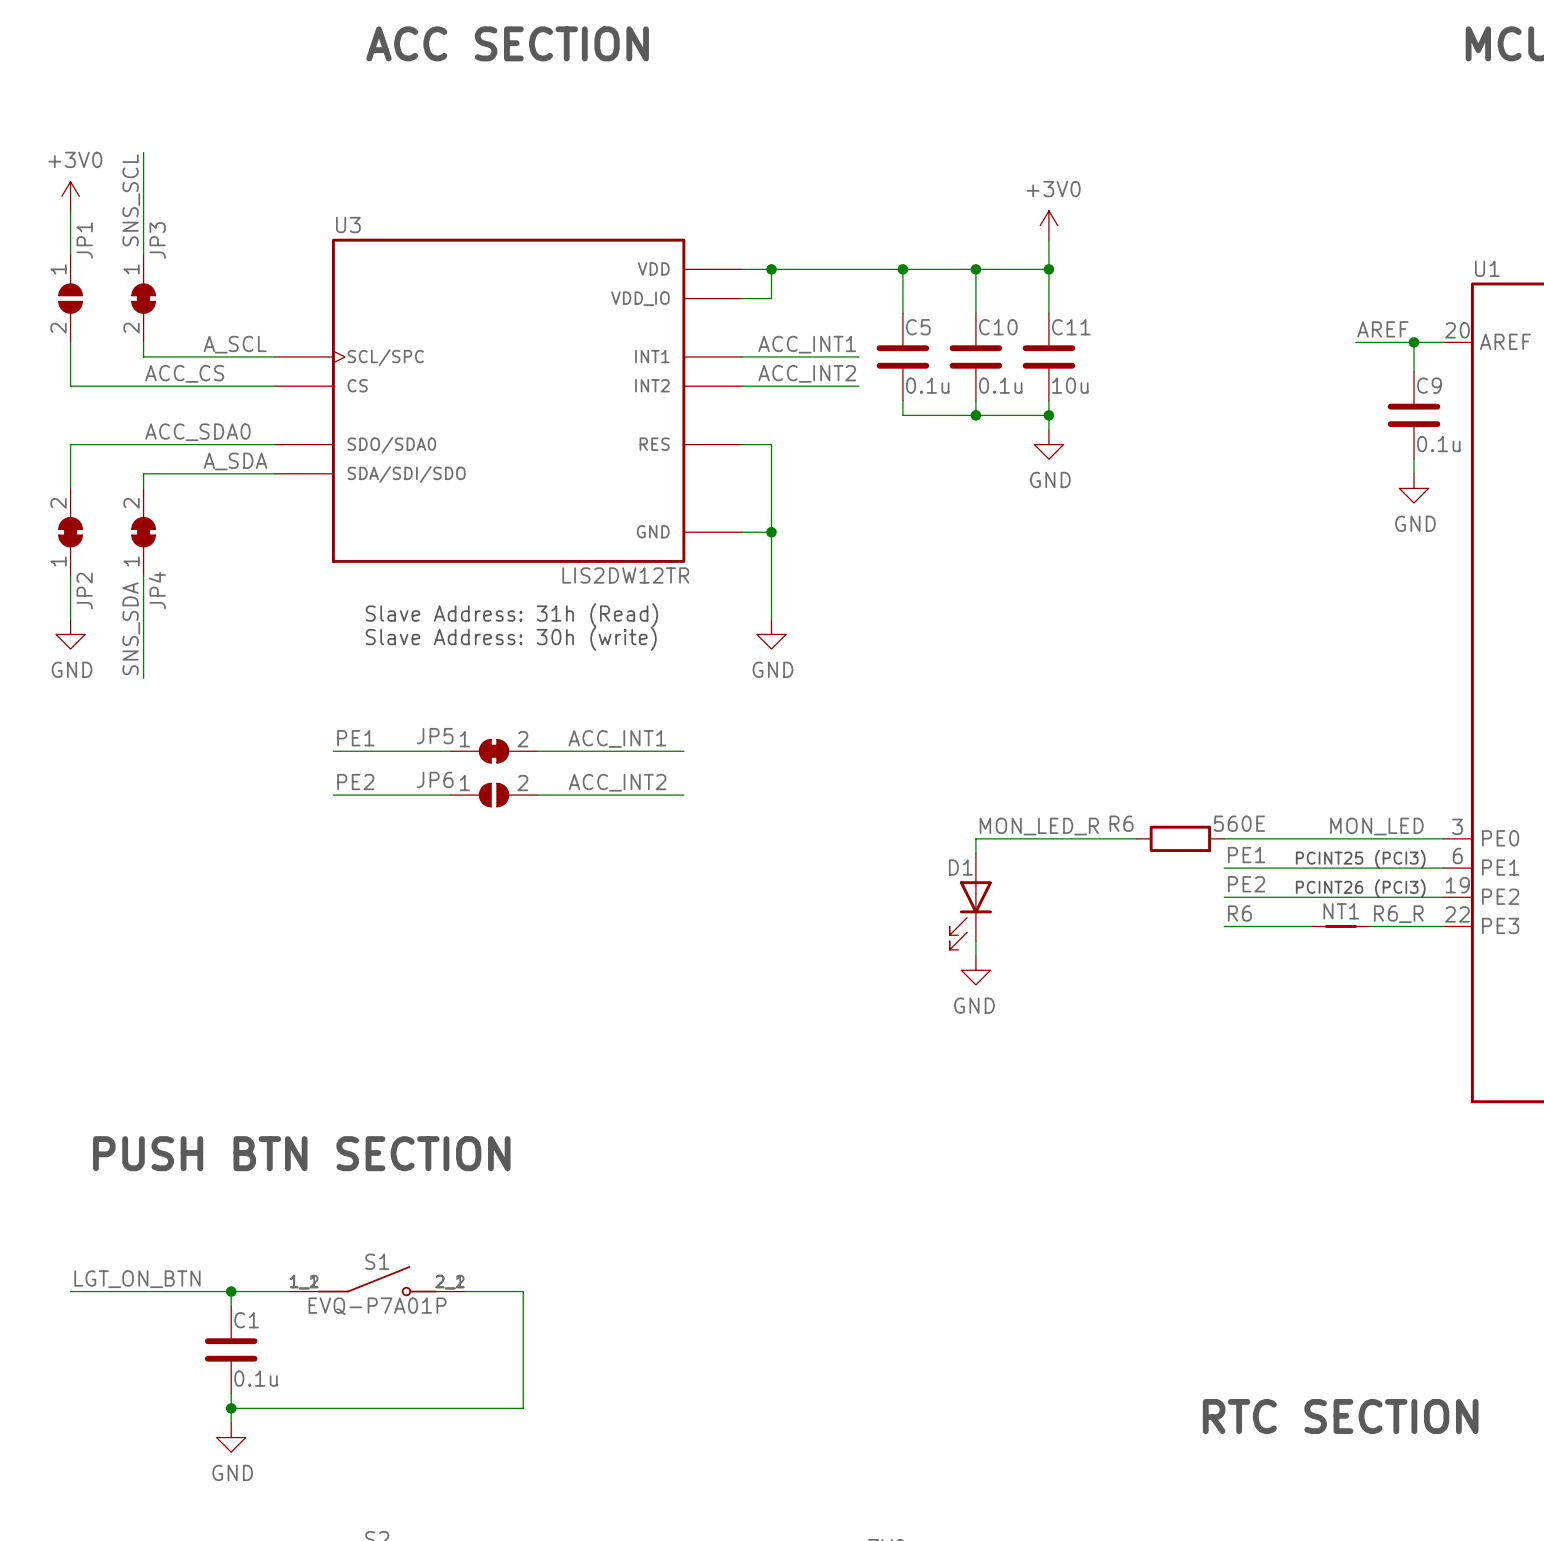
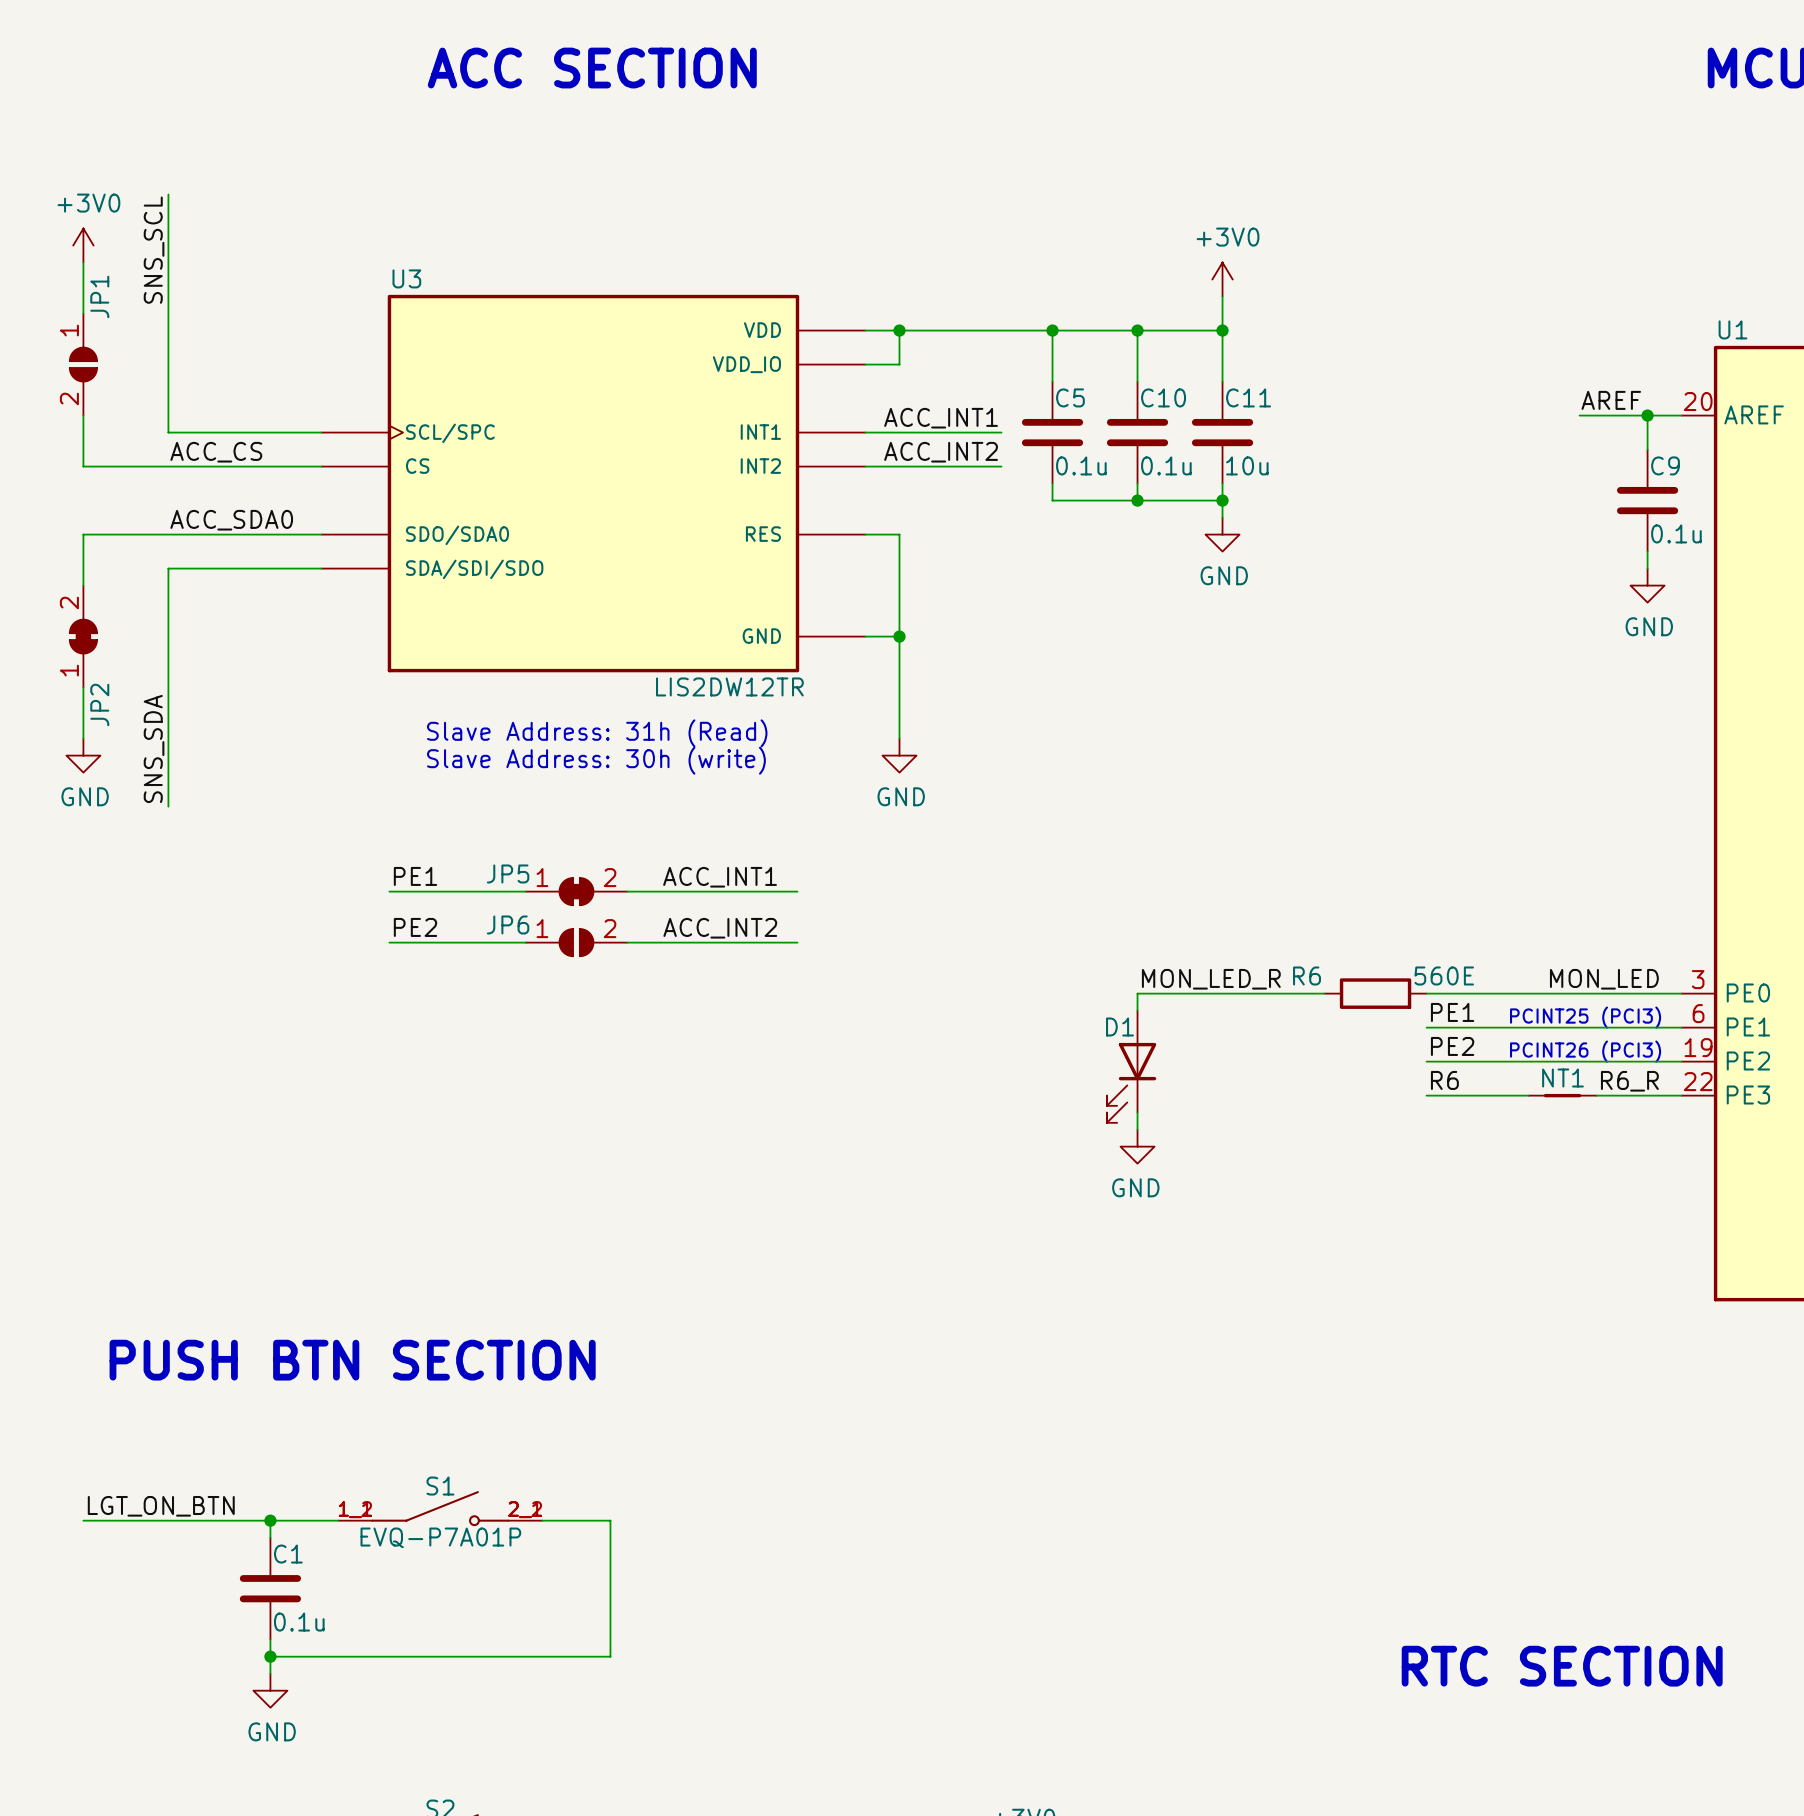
JP3: (143, 298) -> none
label: A_SCL (235, 344) -> none
label: A_SDA (235, 461) -> none
JP4: (143, 532) -> none

